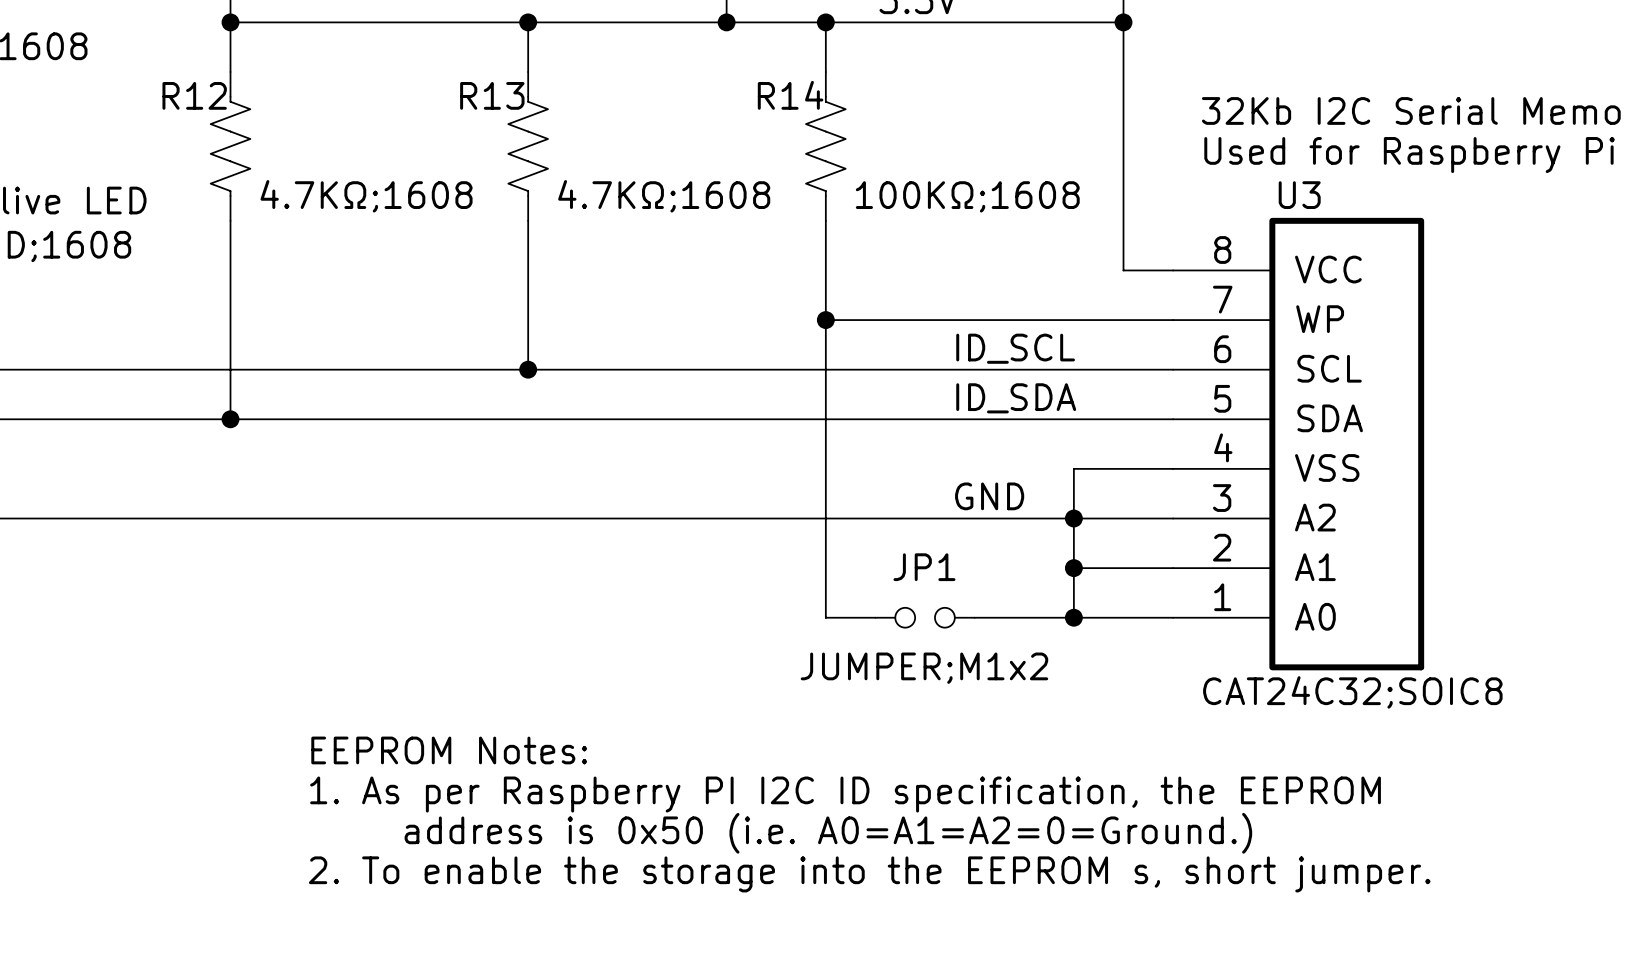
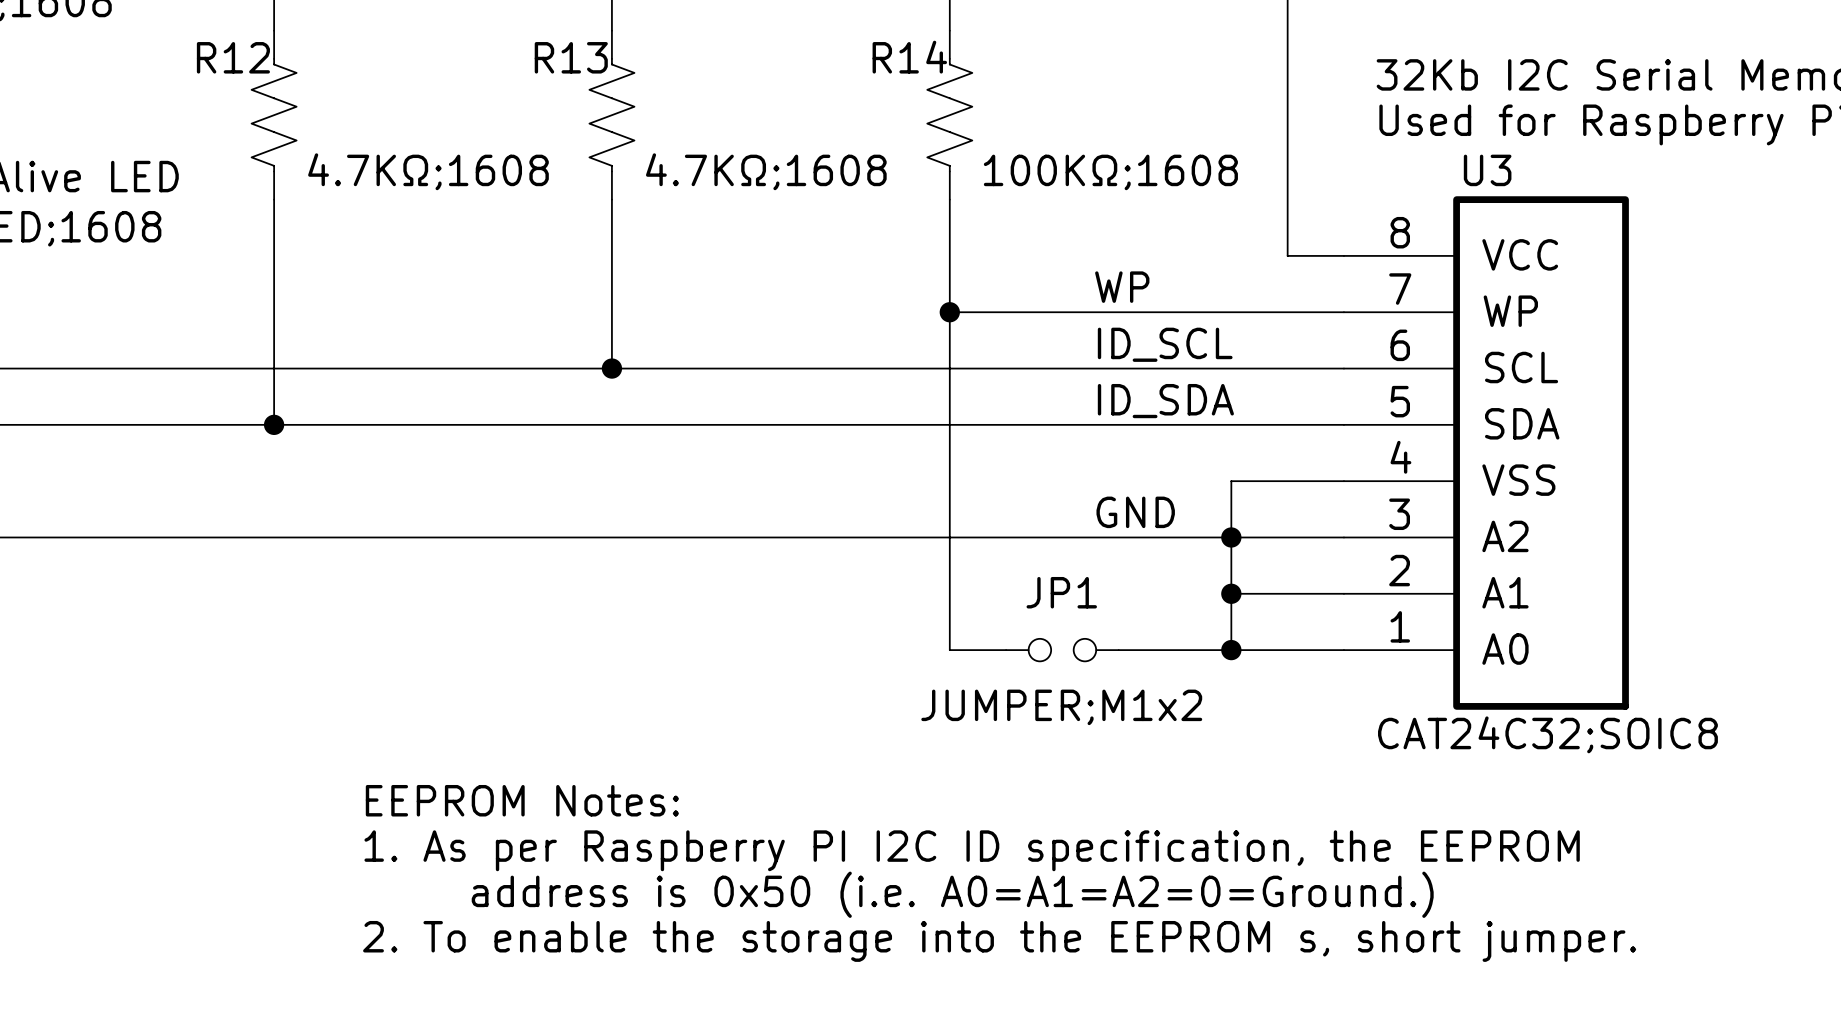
label: none -> WP (1122, 287)

